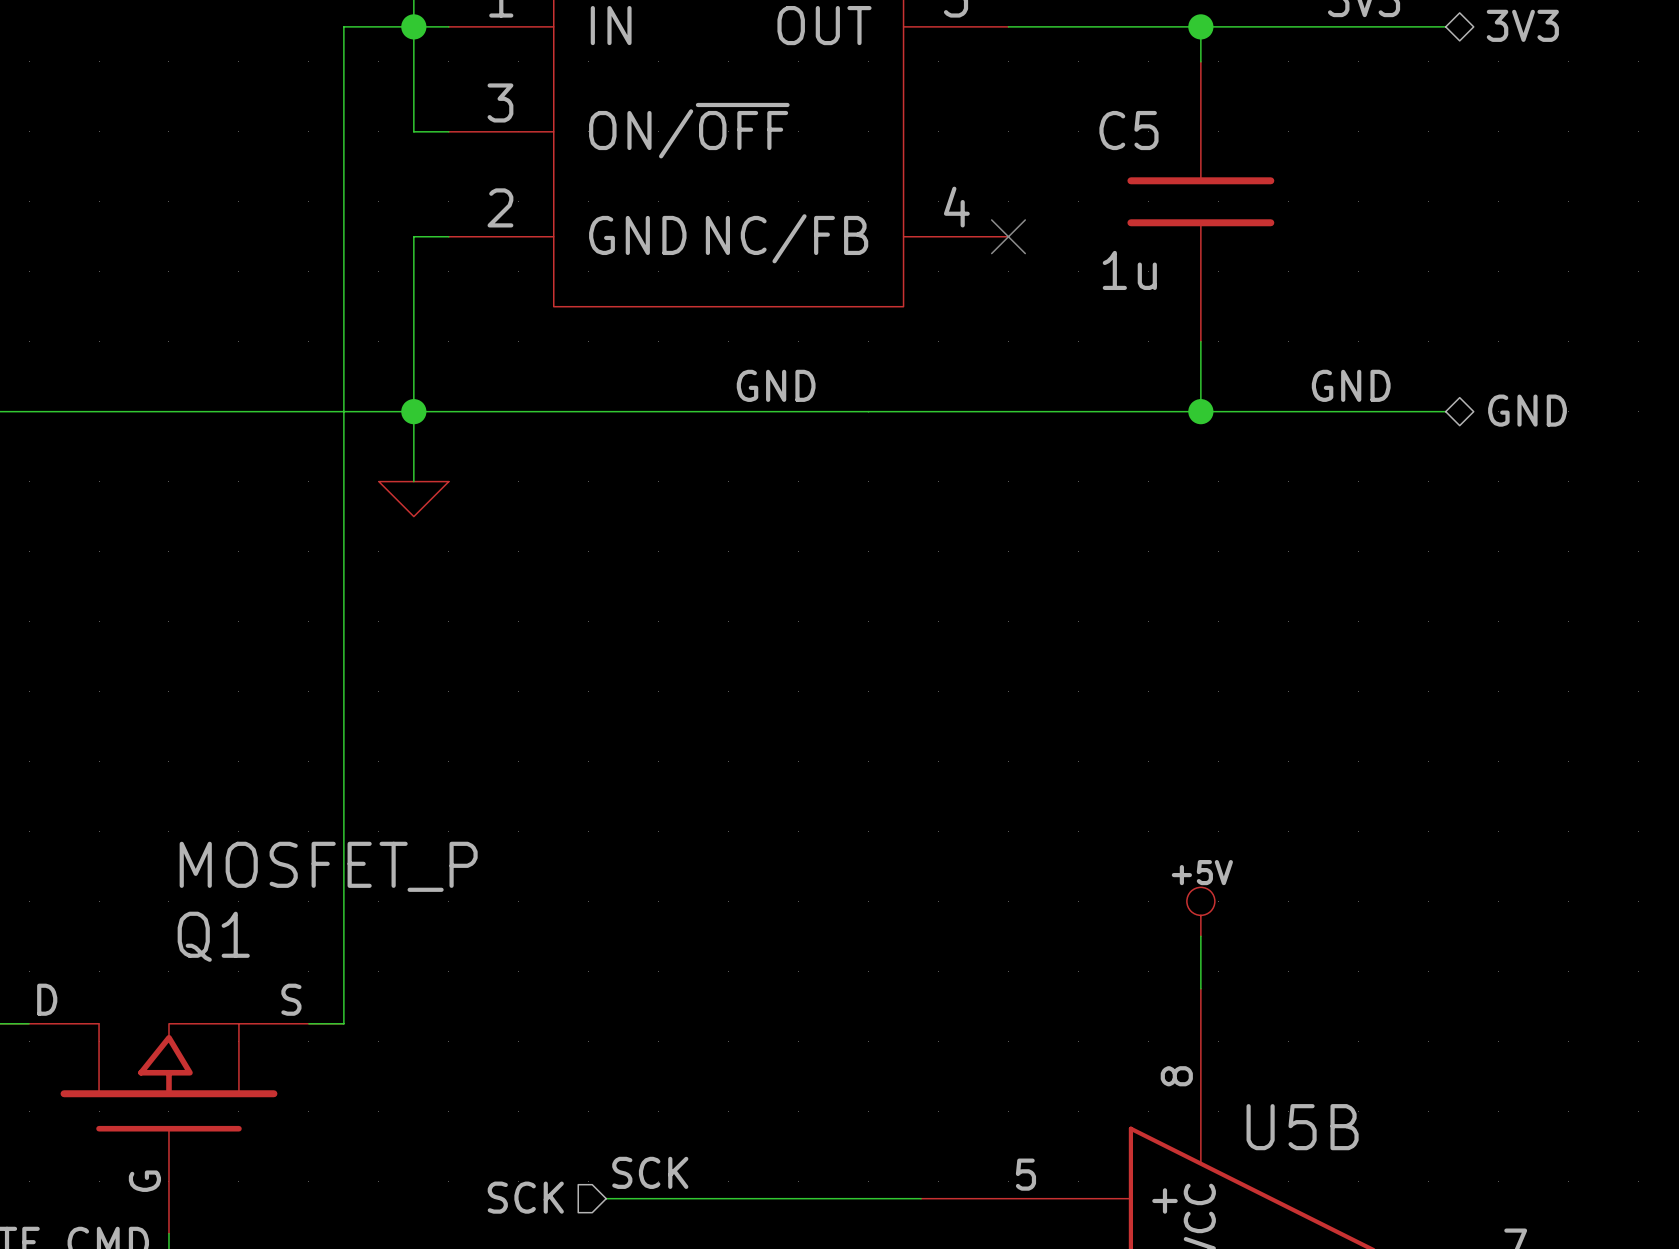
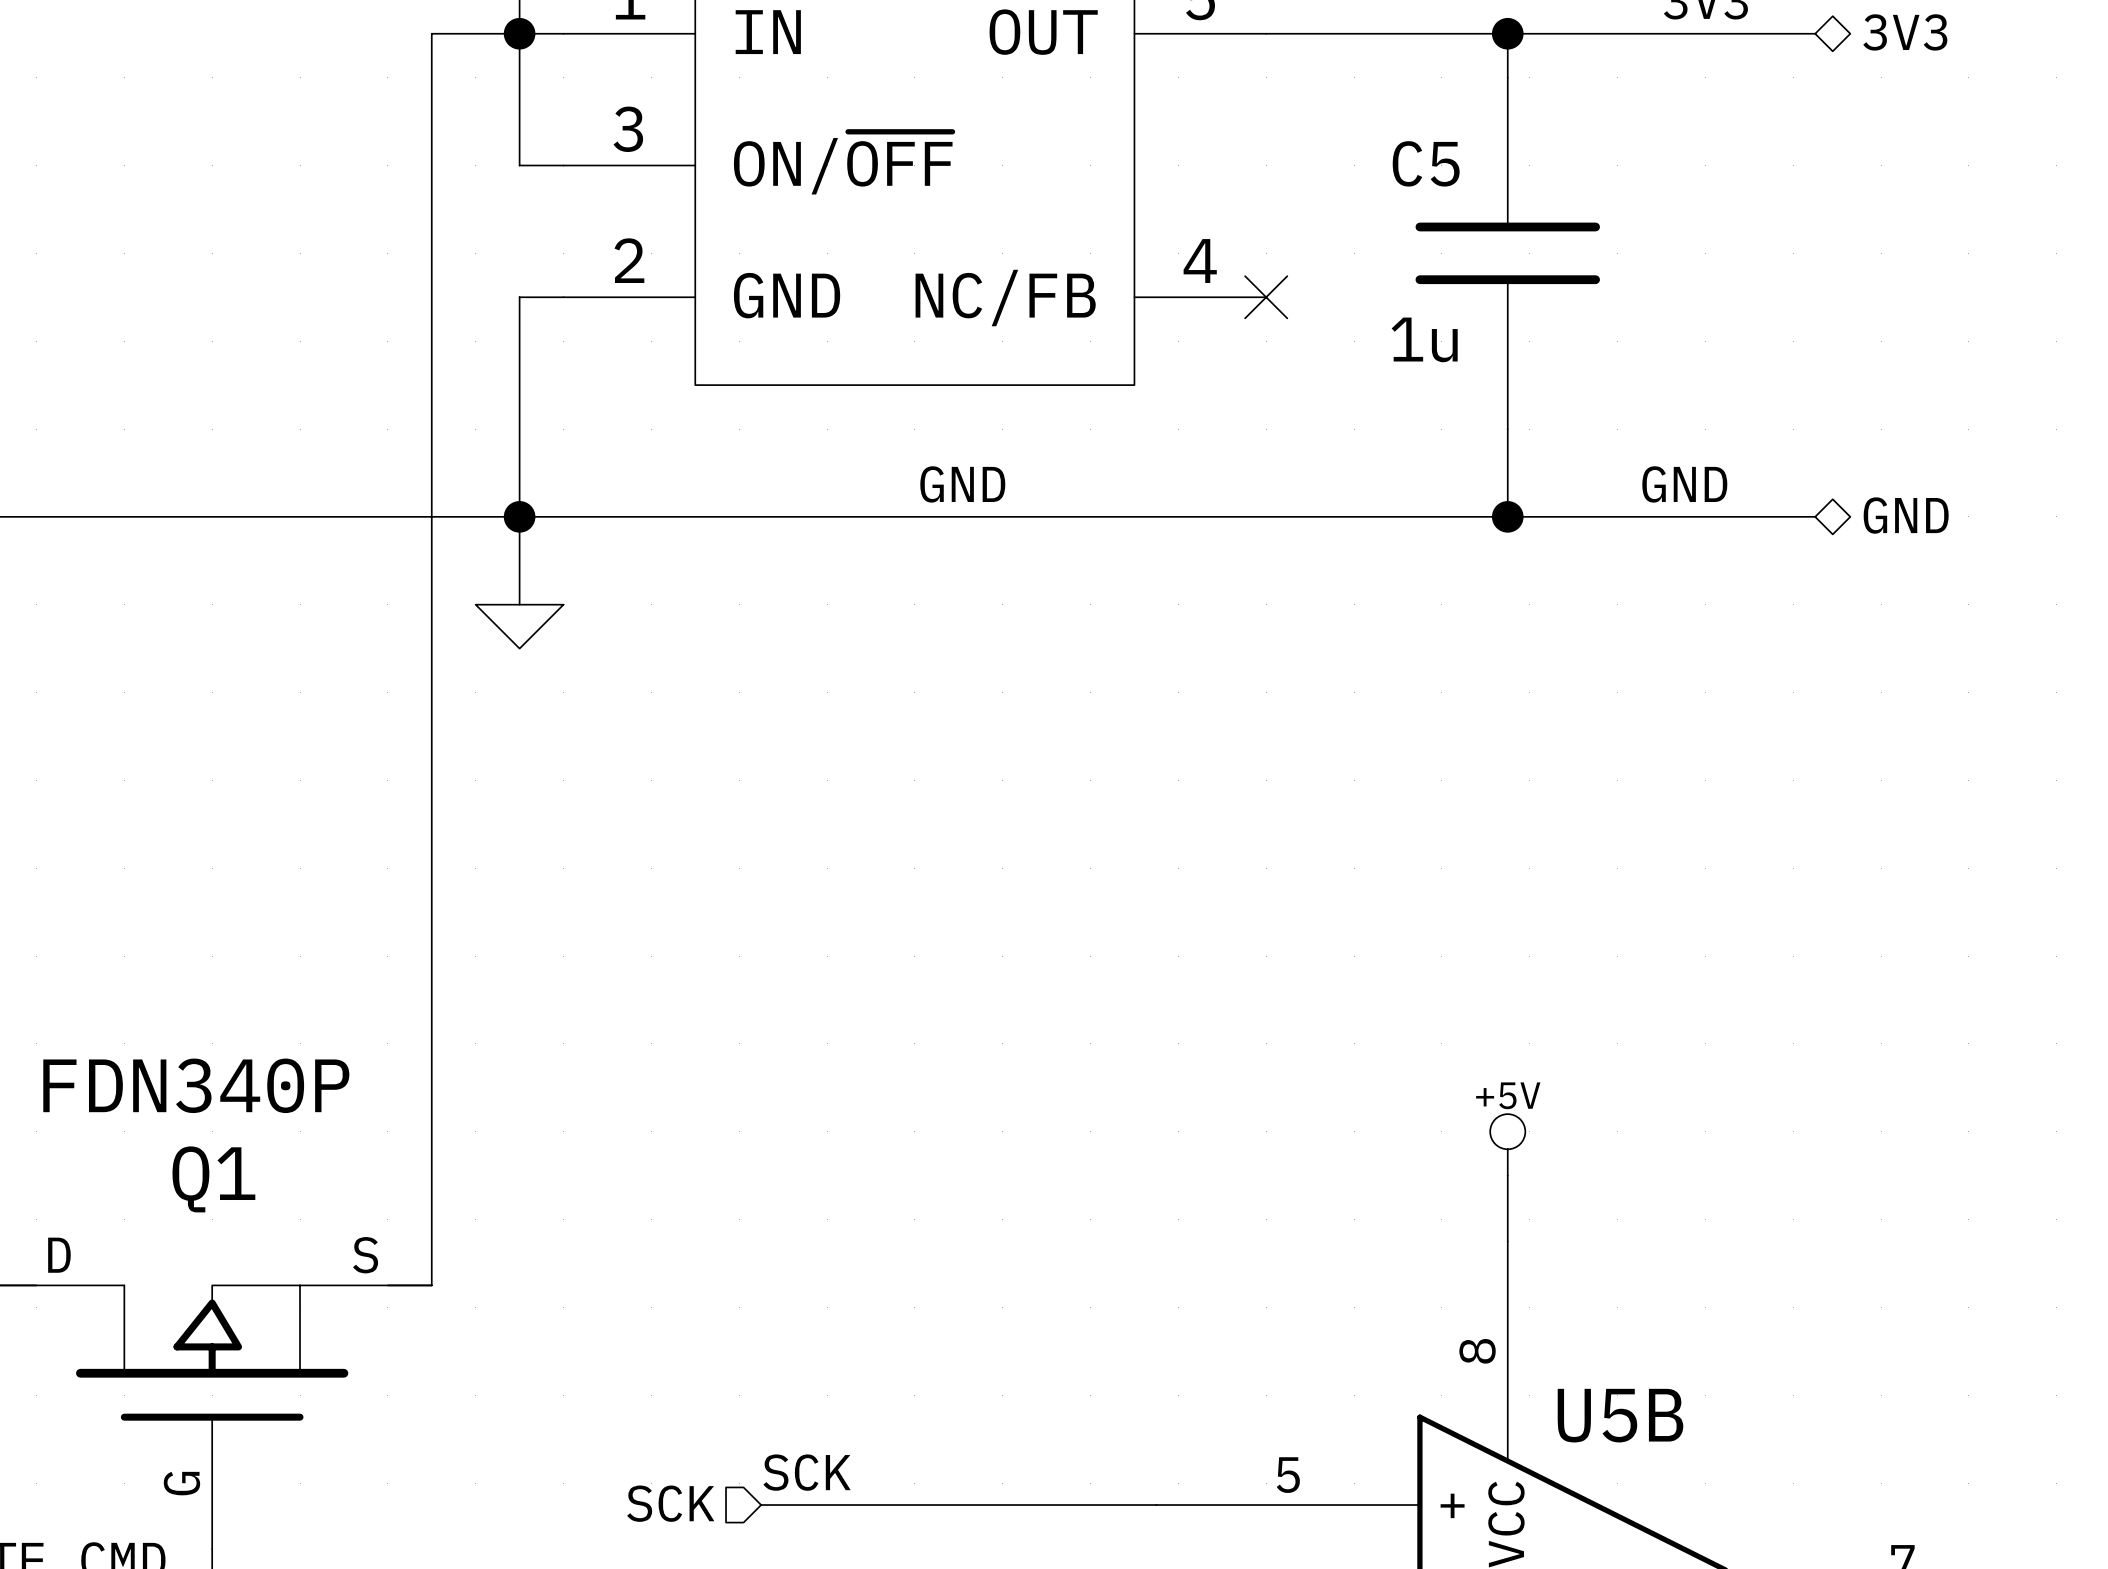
Q1 value: MOSFET_P (328, 866) -> FDN340P (196, 1085)
Q1 name position: Q1 (213, 936) -> Q1 (213, 1179)

